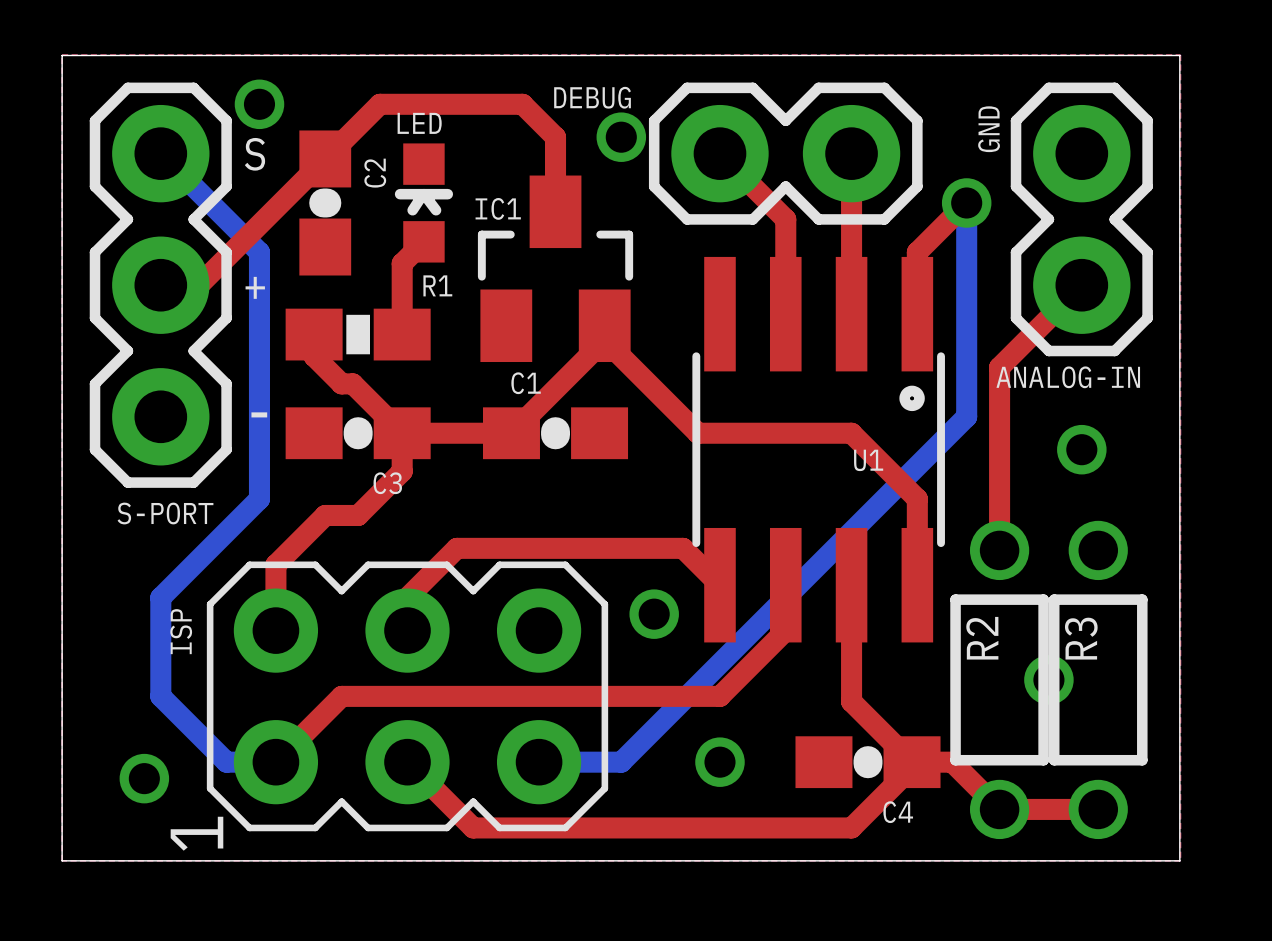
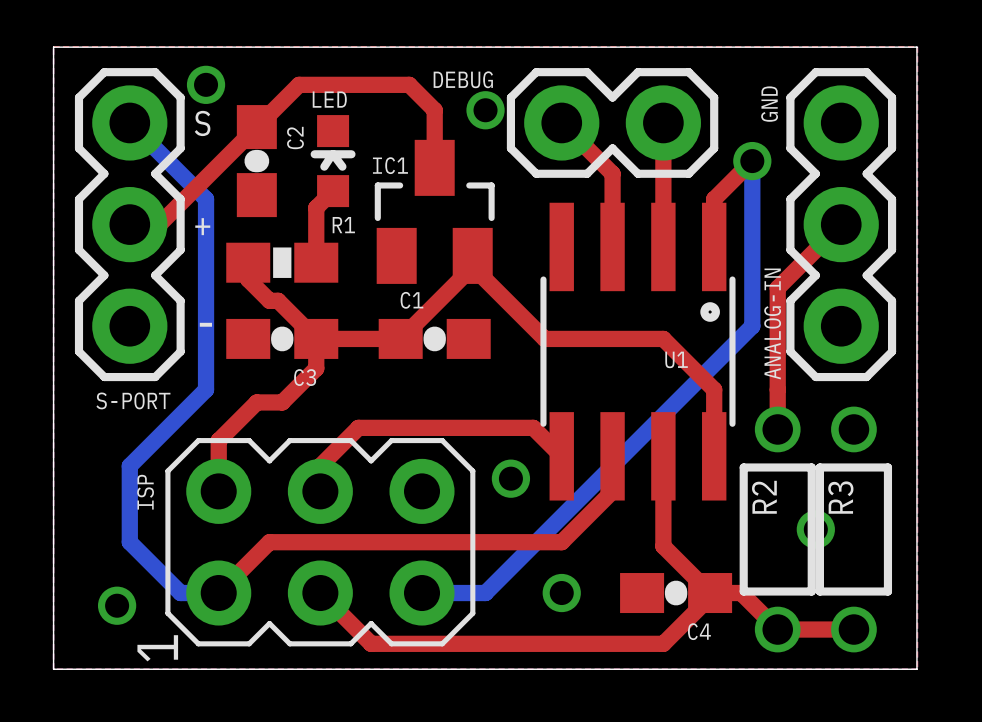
ANALOG-IN: (1081, 219) -> none
ANALOG-IN: none -> (841, 224)
via: (1081, 449) -> none

